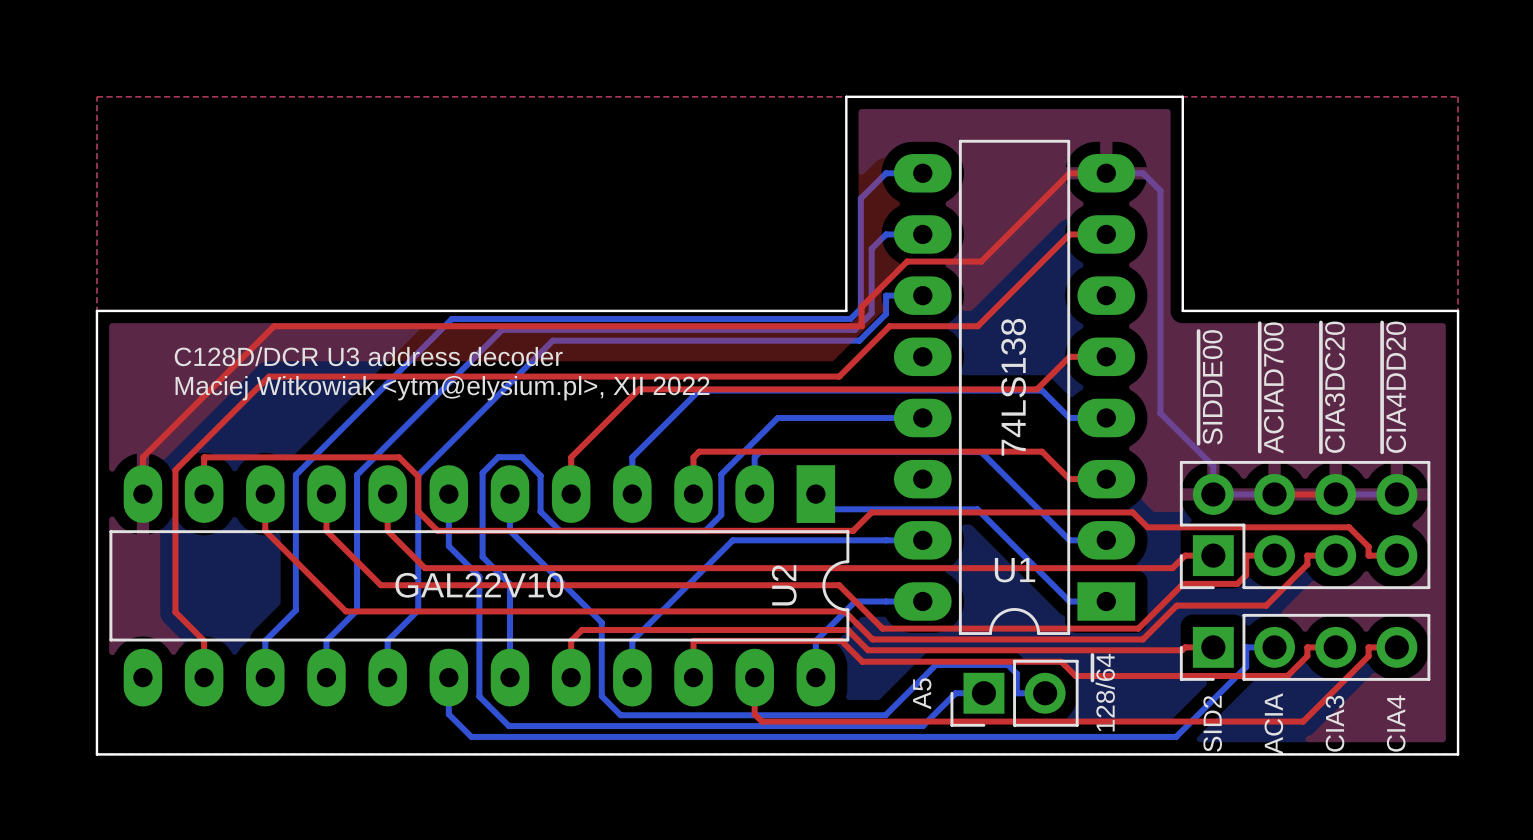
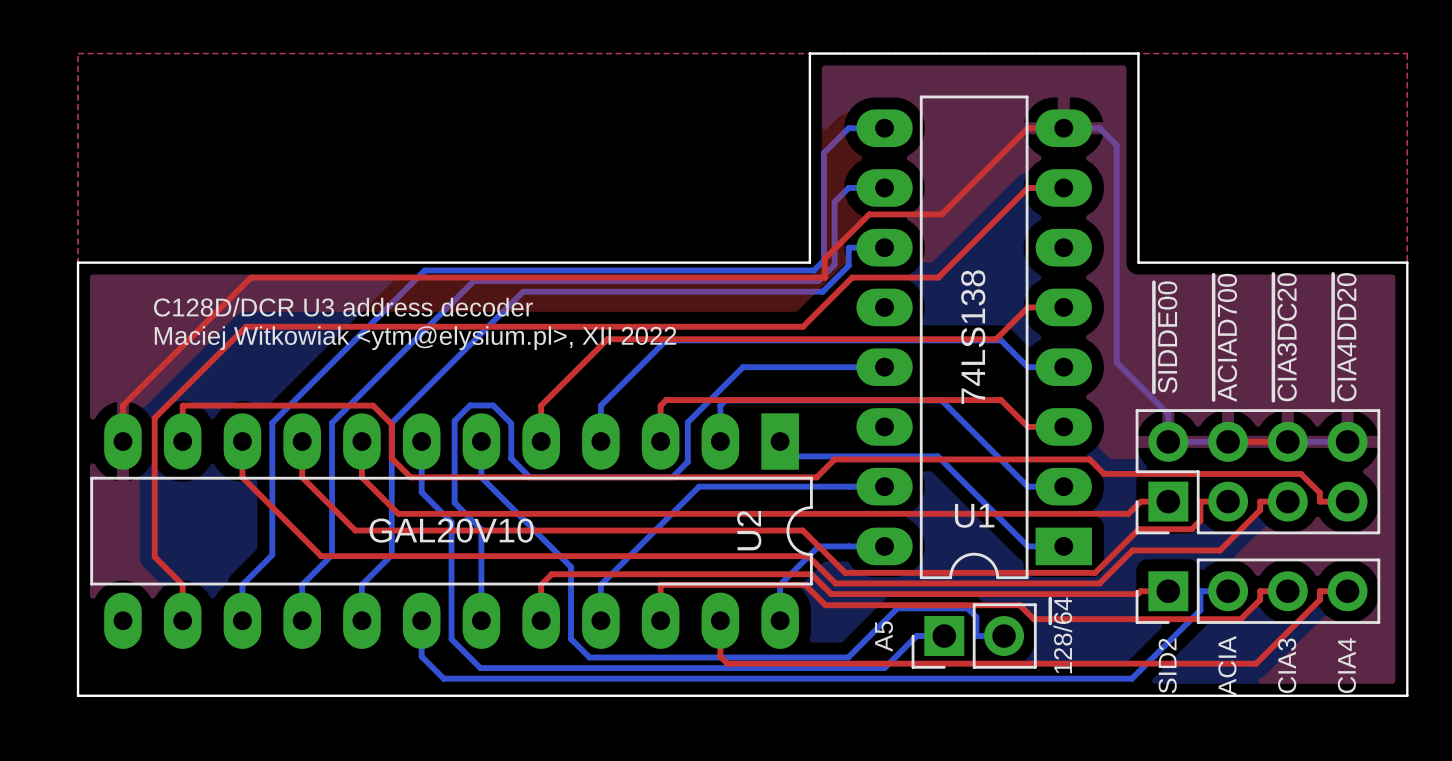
U2 value: GAL22V10 (479, 585) -> GAL20V10 (451, 530)

